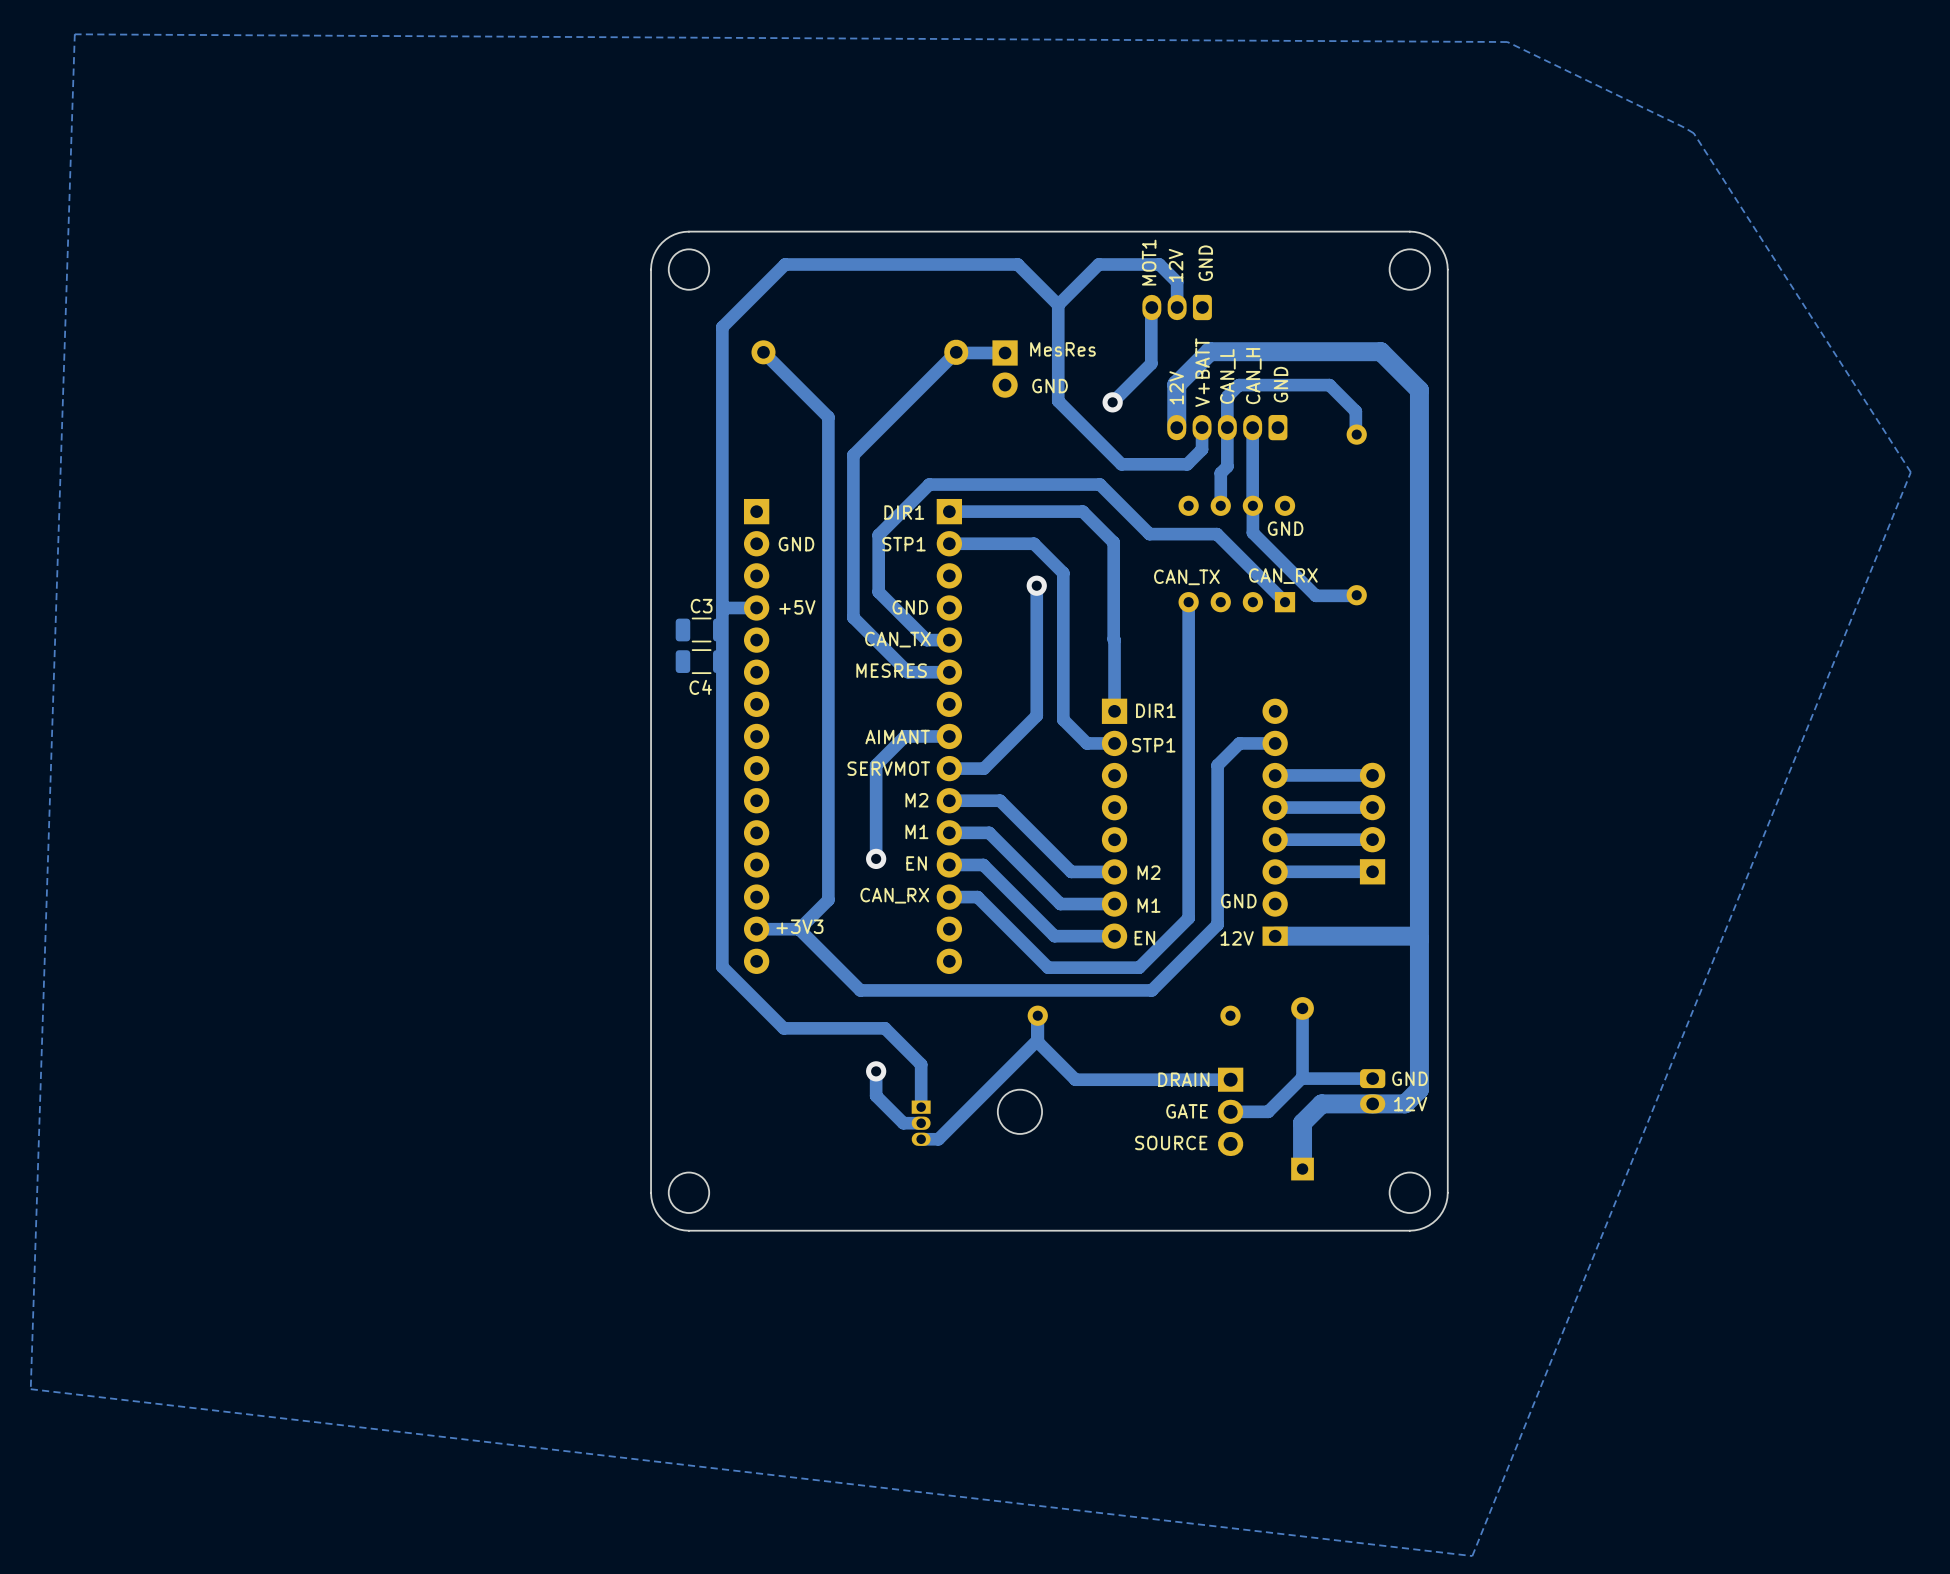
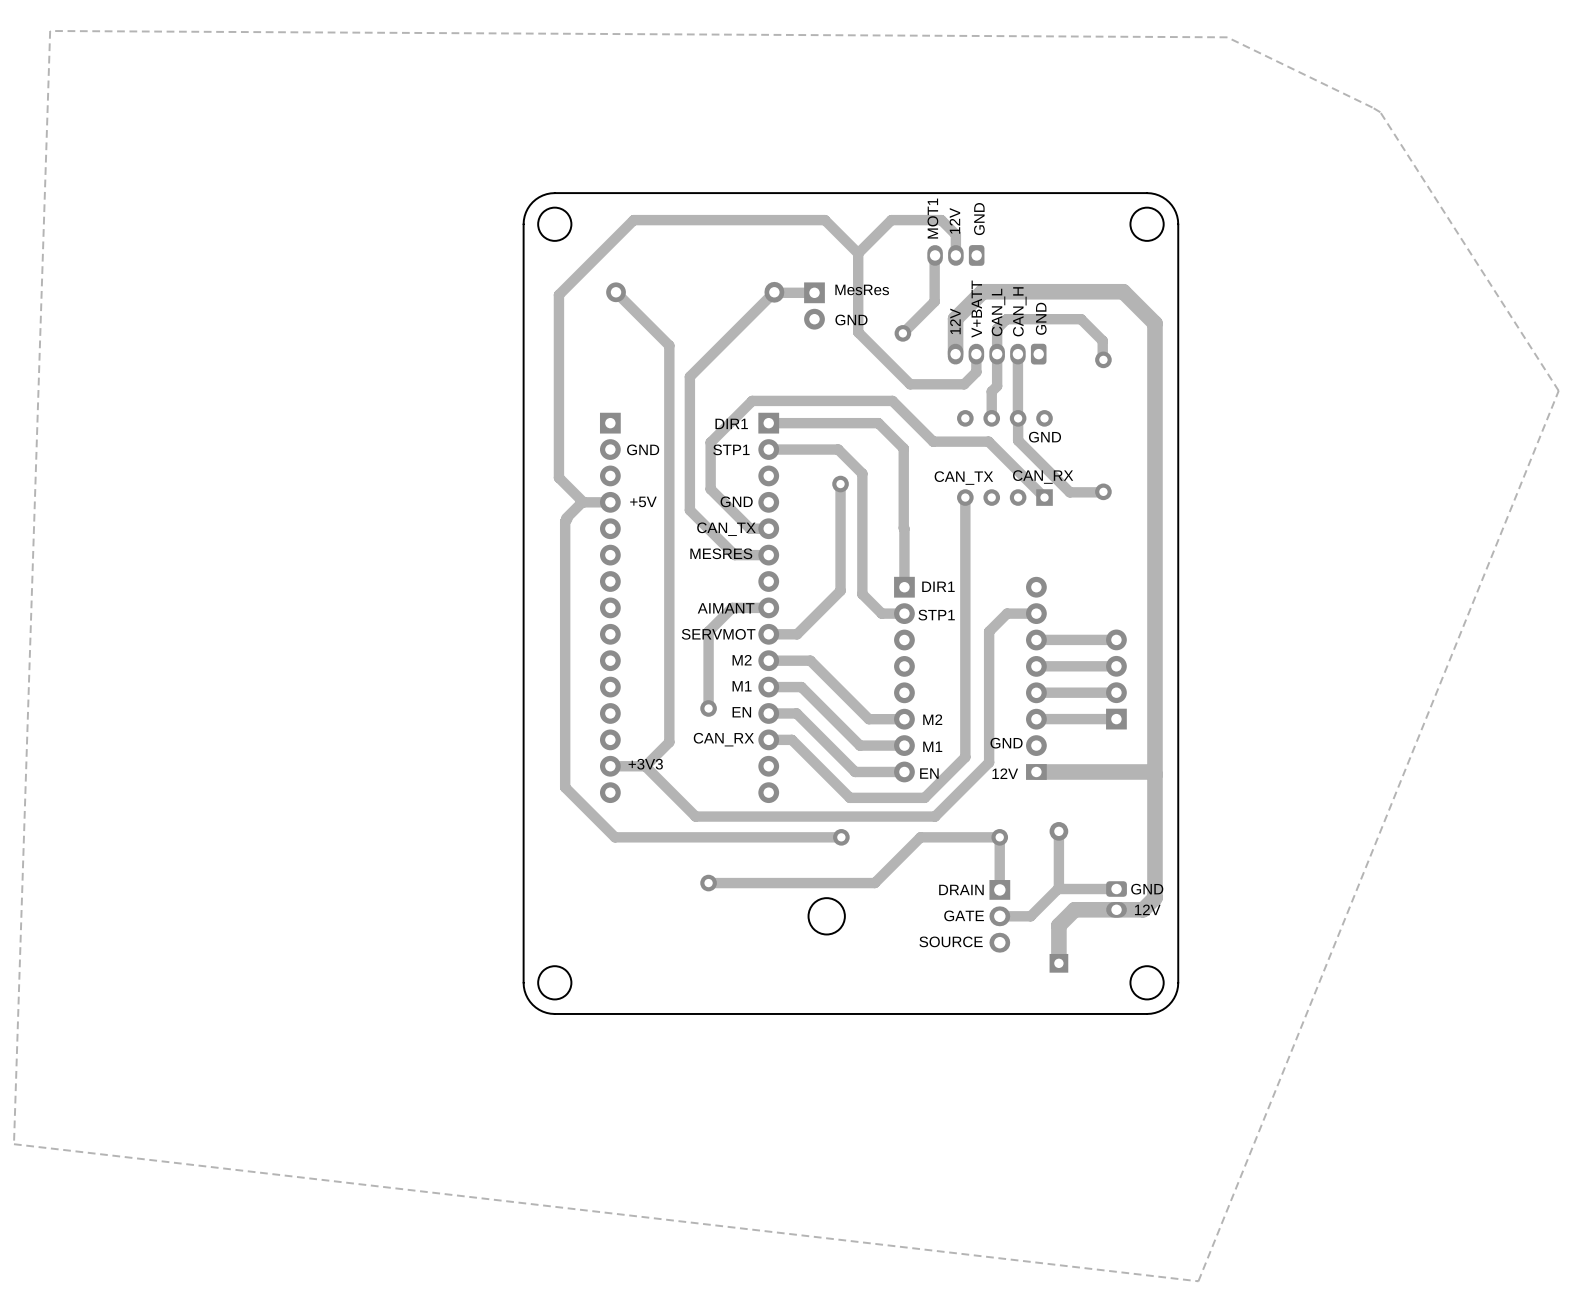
track: (722, 327) (722, 966) (783, 1028) (885, 1028) (921, 1064) (921, 1107) -> (582, 271) (558, 294) (558, 477) (583, 502)
track: none -> (582, 502) (566, 518)
track: none -> (567, 519) (565, 521) (565, 787) (615, 837) (841, 837)
C3: (701, 629) -> none
C4: (701, 661) -> none
track: (1037, 1015) (1037, 1042) (1075, 1079) (1230, 1079) -> (708, 883) (874, 883) (920, 837) (999, 837) (999, 889)
track: (1037, 1040) (938, 1139) (921, 1139) -> none
track: (876, 1071) (876, 1095) (903, 1123) (921, 1123) -> none
part: (921, 1123) -> none

